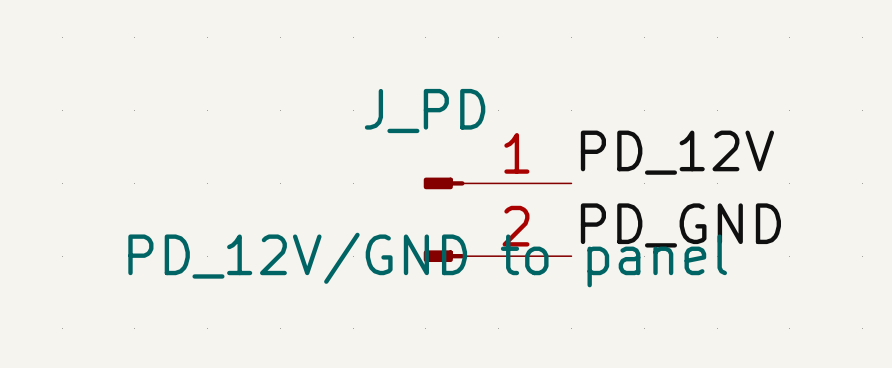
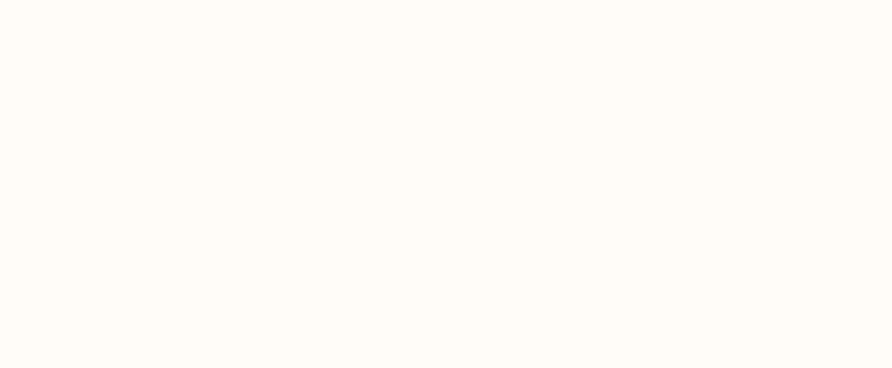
label: PD_12V (677, 152) -> none
J_PD: PD_12V/GND to panel (497, 219) -> none
label: PD_GND (680, 225) -> none

